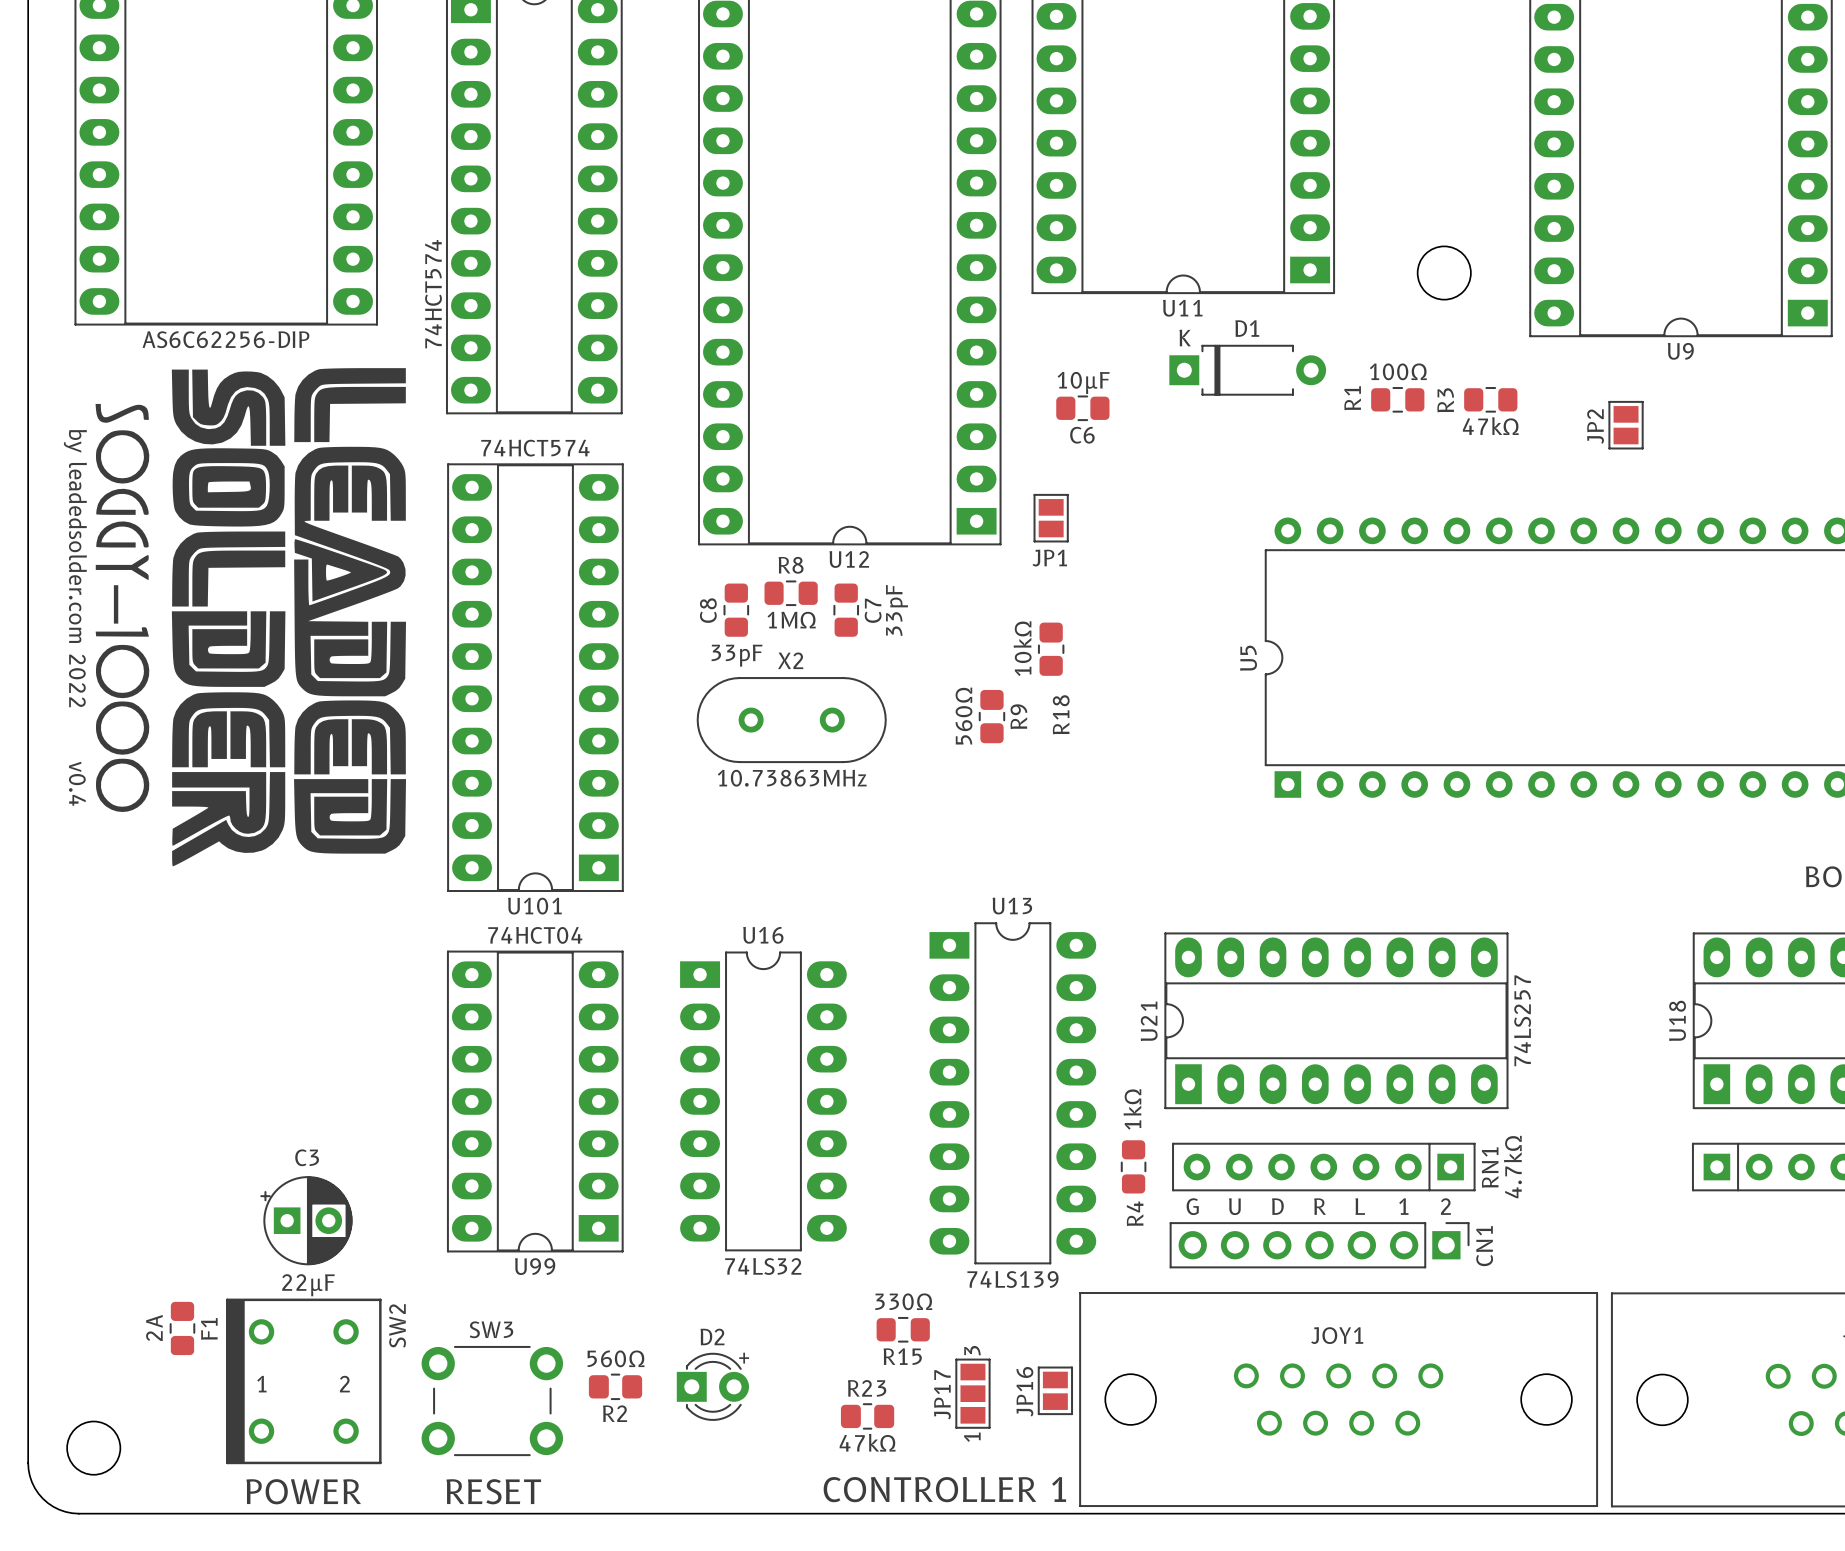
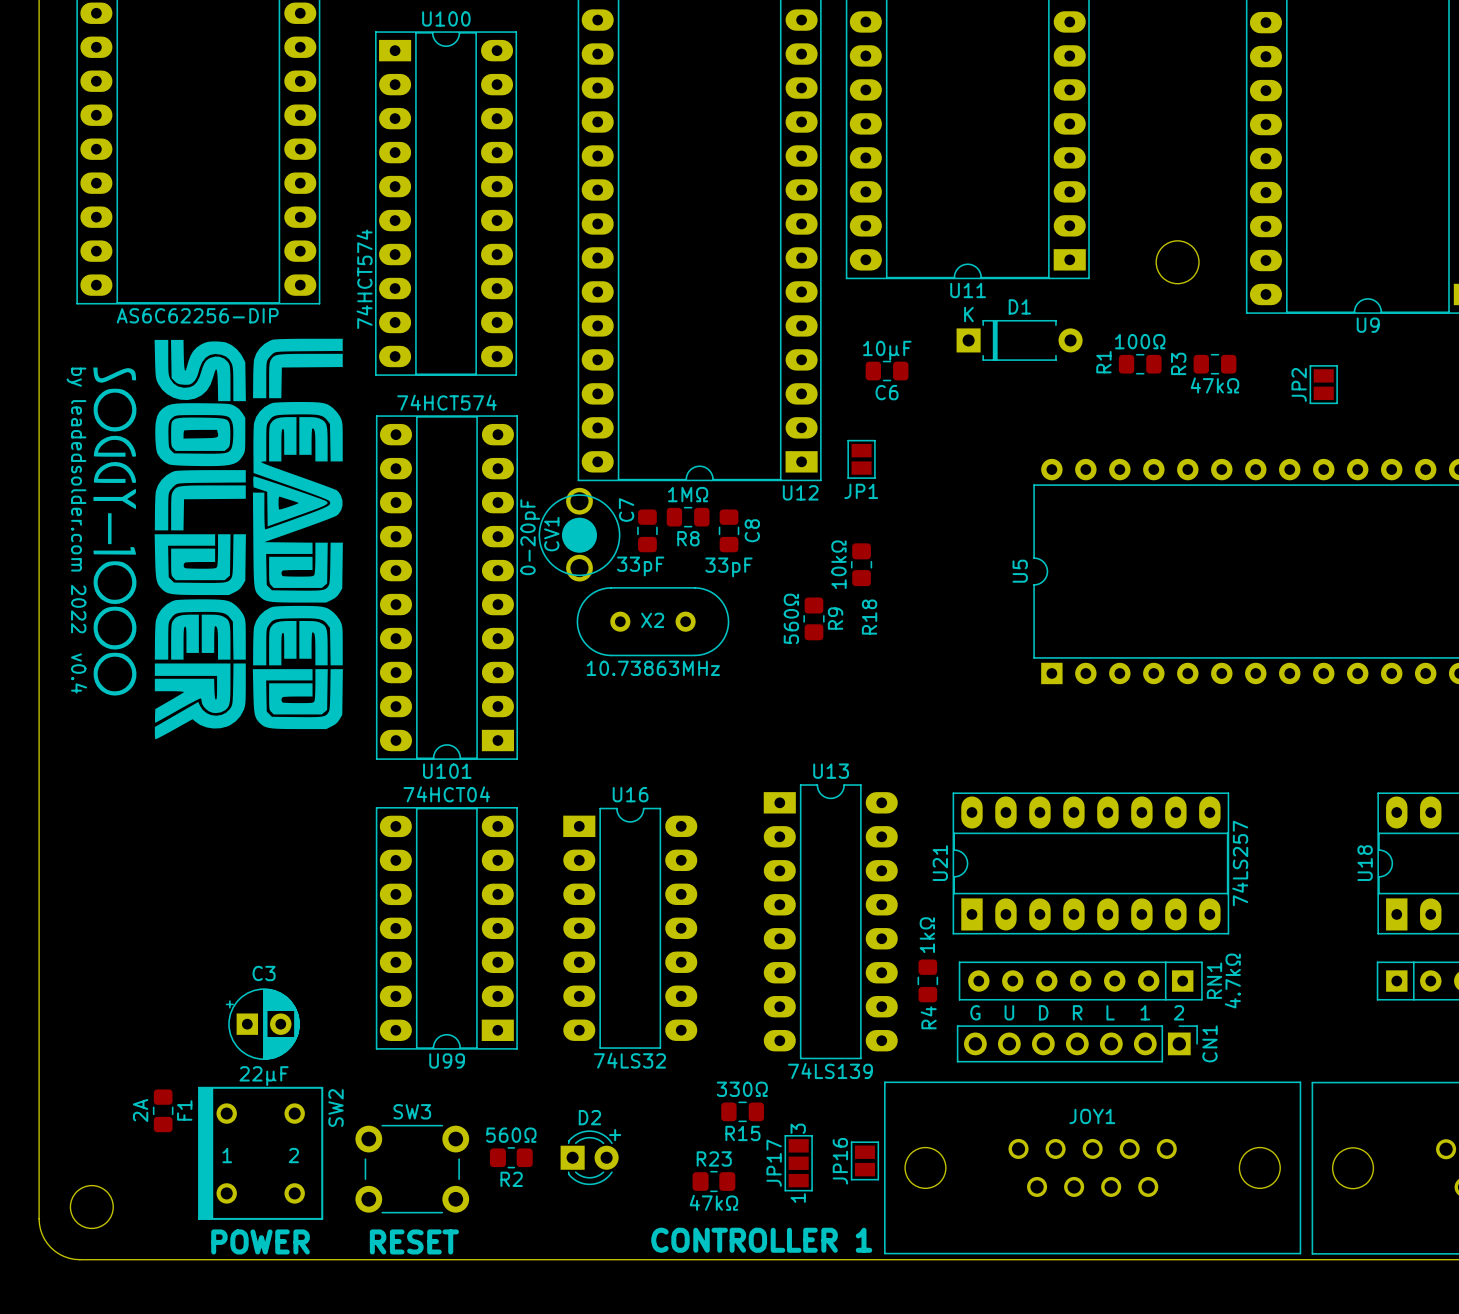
U12 name position: U12 (849, 559) -> U12 (800, 492)
R8 name position: R8 (791, 565) -> R8 (688, 538)
R8 position: (791, 593) -> (688, 517)
C8 name position: C8 (708, 610) -> C8 (752, 530)
C8 position: (736, 610) -> (729, 530)
C7 position: (846, 610) -> (647, 530)
C7 name position: C7 (873, 610) -> C7 (626, 510)
C7 value rotation: 0° (896, 610) -> 90° clockwise (640, 566)
CV1: none -> 0-20pF (579, 534)
R8 value position: 1MΩ (791, 620) -> 1MΩ (688, 494)
X2 name position: X2 (790, 660) -> X2 (652, 620)

